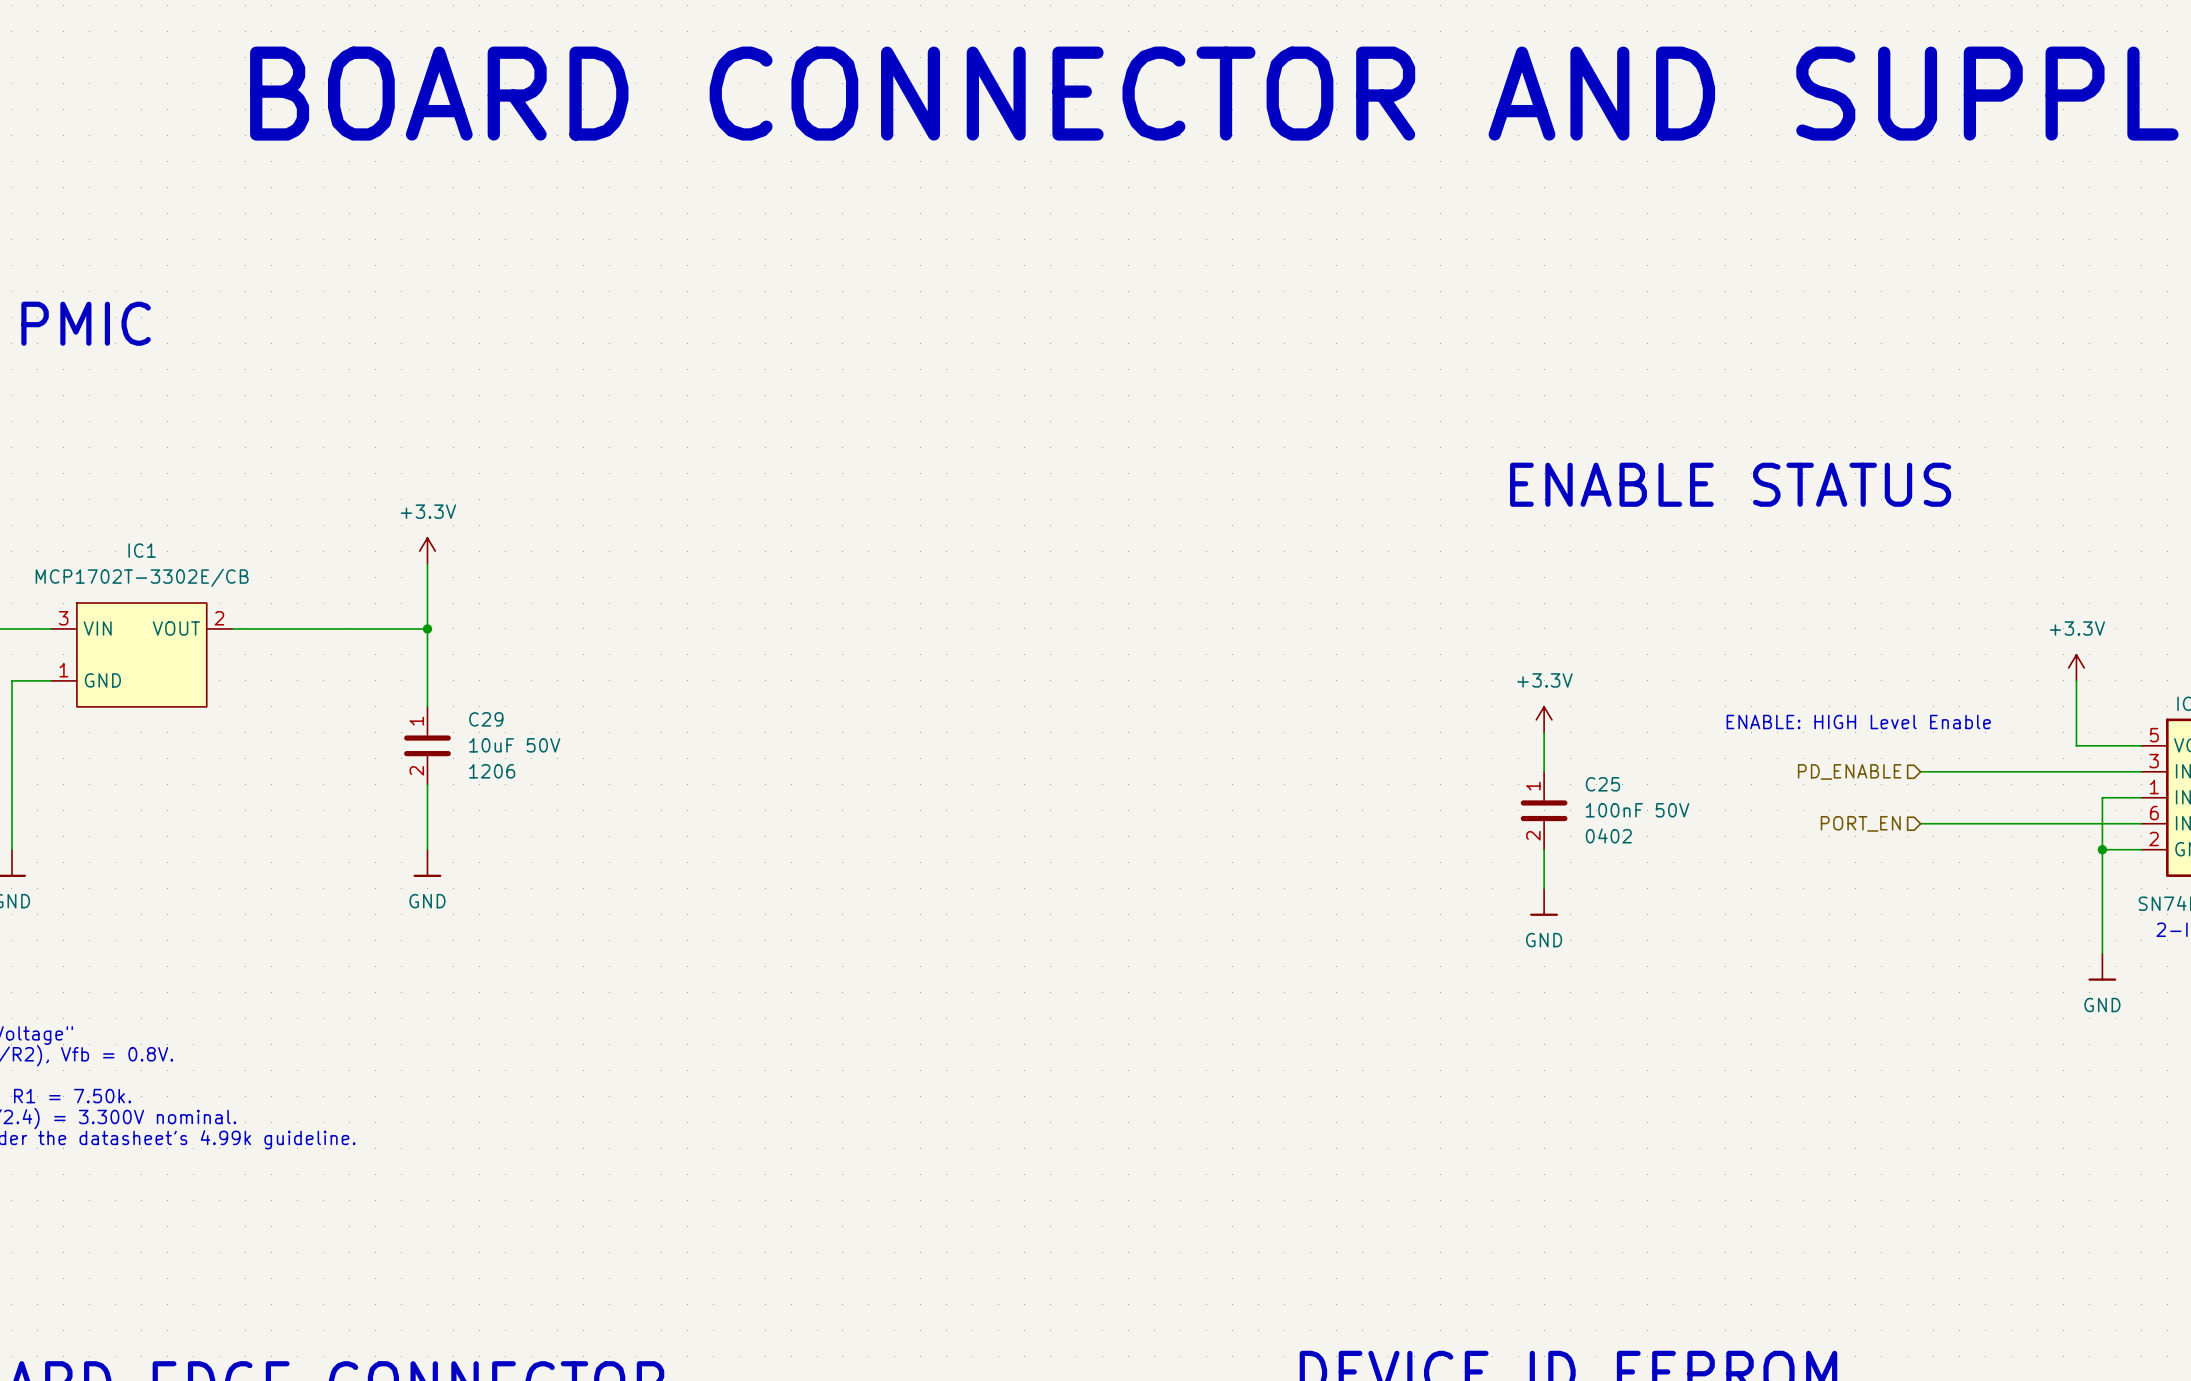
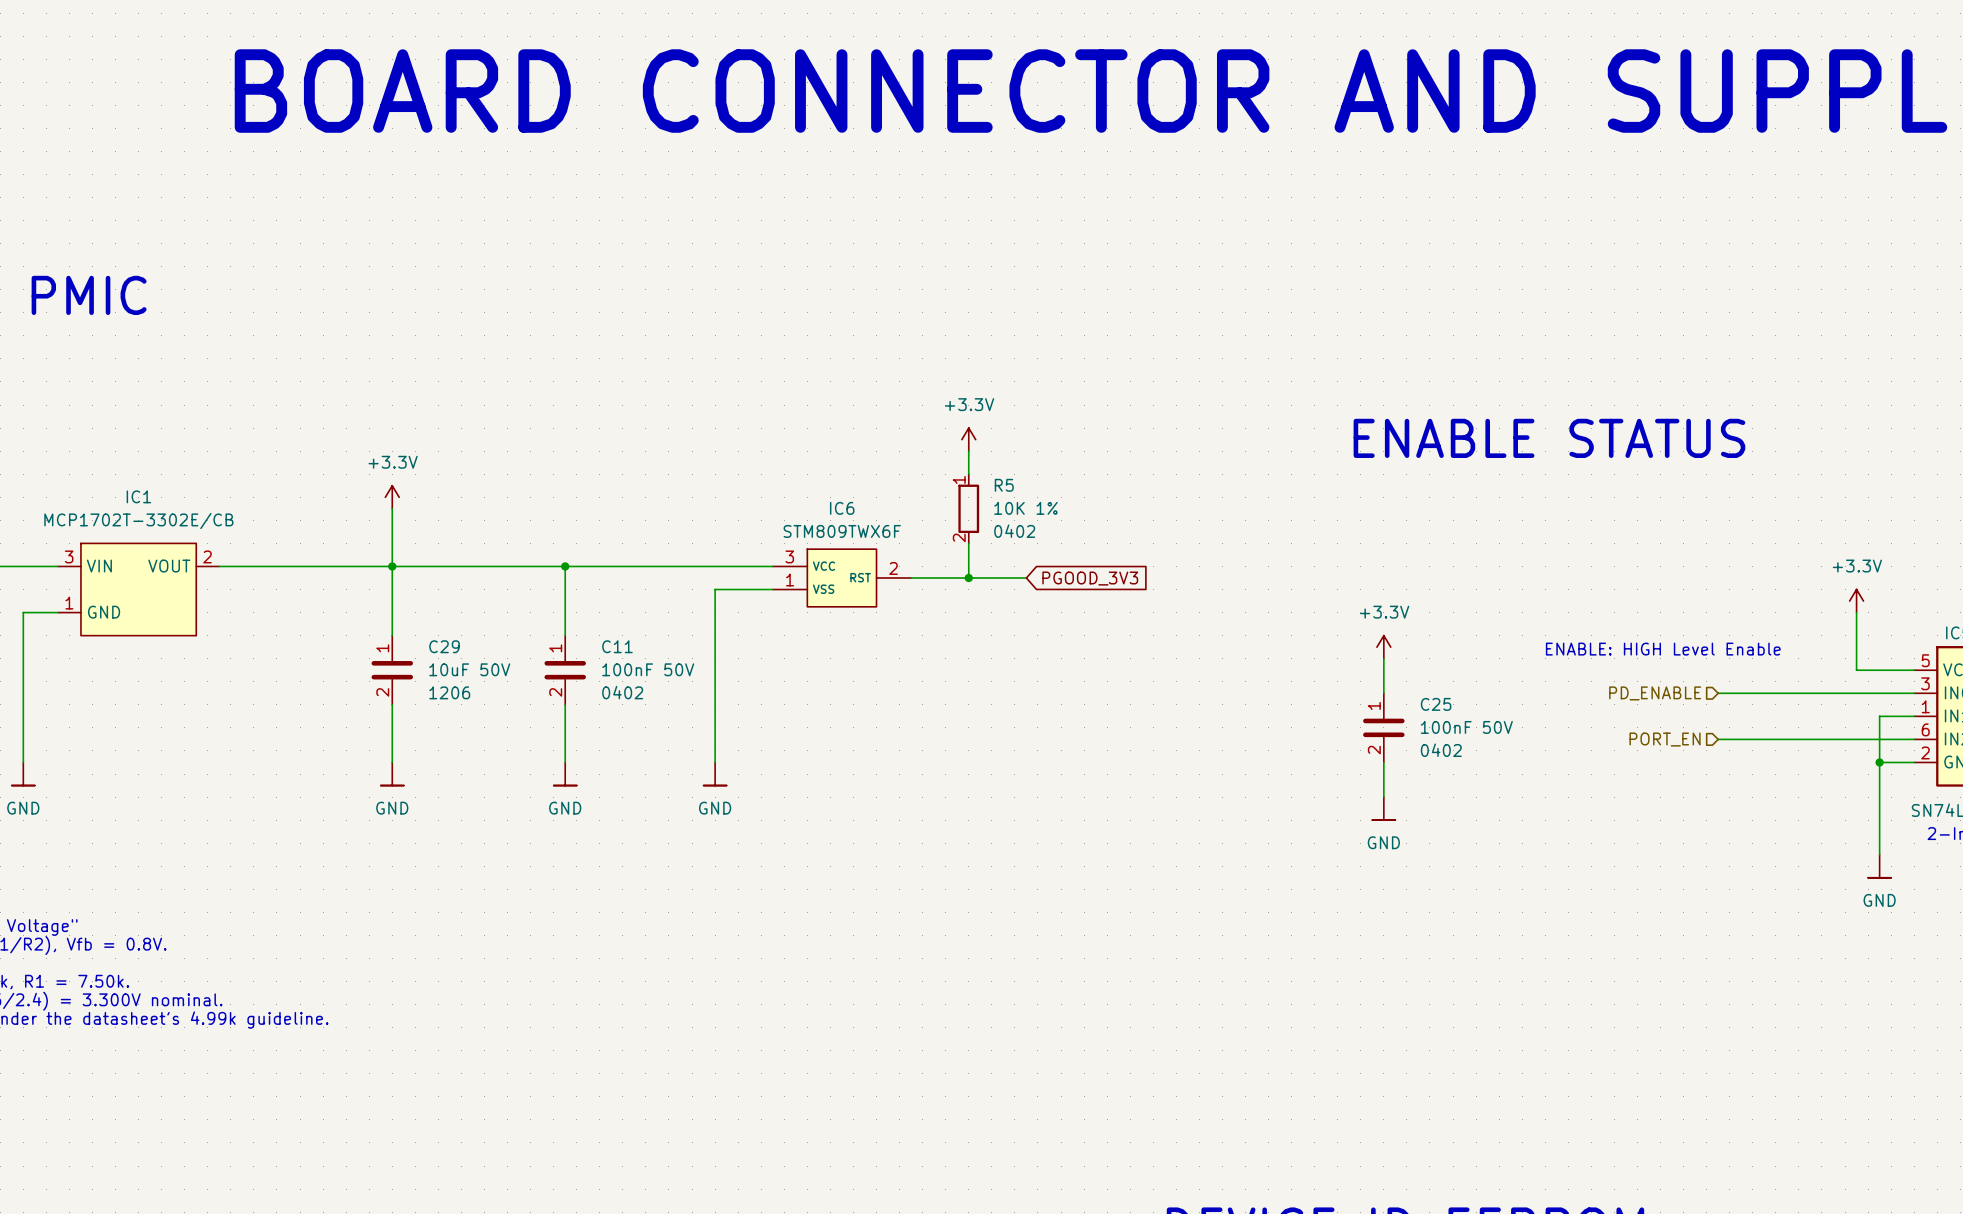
power symbol: none -> +3.3V (968, 439)
wire: none -> (968, 451) (968, 474)
R5: none -> 10K 1% (968, 508)
wire: none -> (968, 543) (968, 577)
wire: none -> (392, 566) (772, 566)
wire: none -> (565, 566) (565, 635)
junction: none -> (565, 566)
IC6: none -> STM809TWX6F (841, 577)
wire: none -> (911, 577) (1026, 577)
junction: none -> (968, 577)
global label: none -> PGOOD_3V3 (1090, 578)
wire: none -> (772, 589) (715, 589) (715, 762)
C11: none -> 100nF 50V (565, 670)
wire: none -> (565, 704) (565, 762)
power symbol: none -> GND (565, 774)
power symbol: none -> GND (715, 774)

